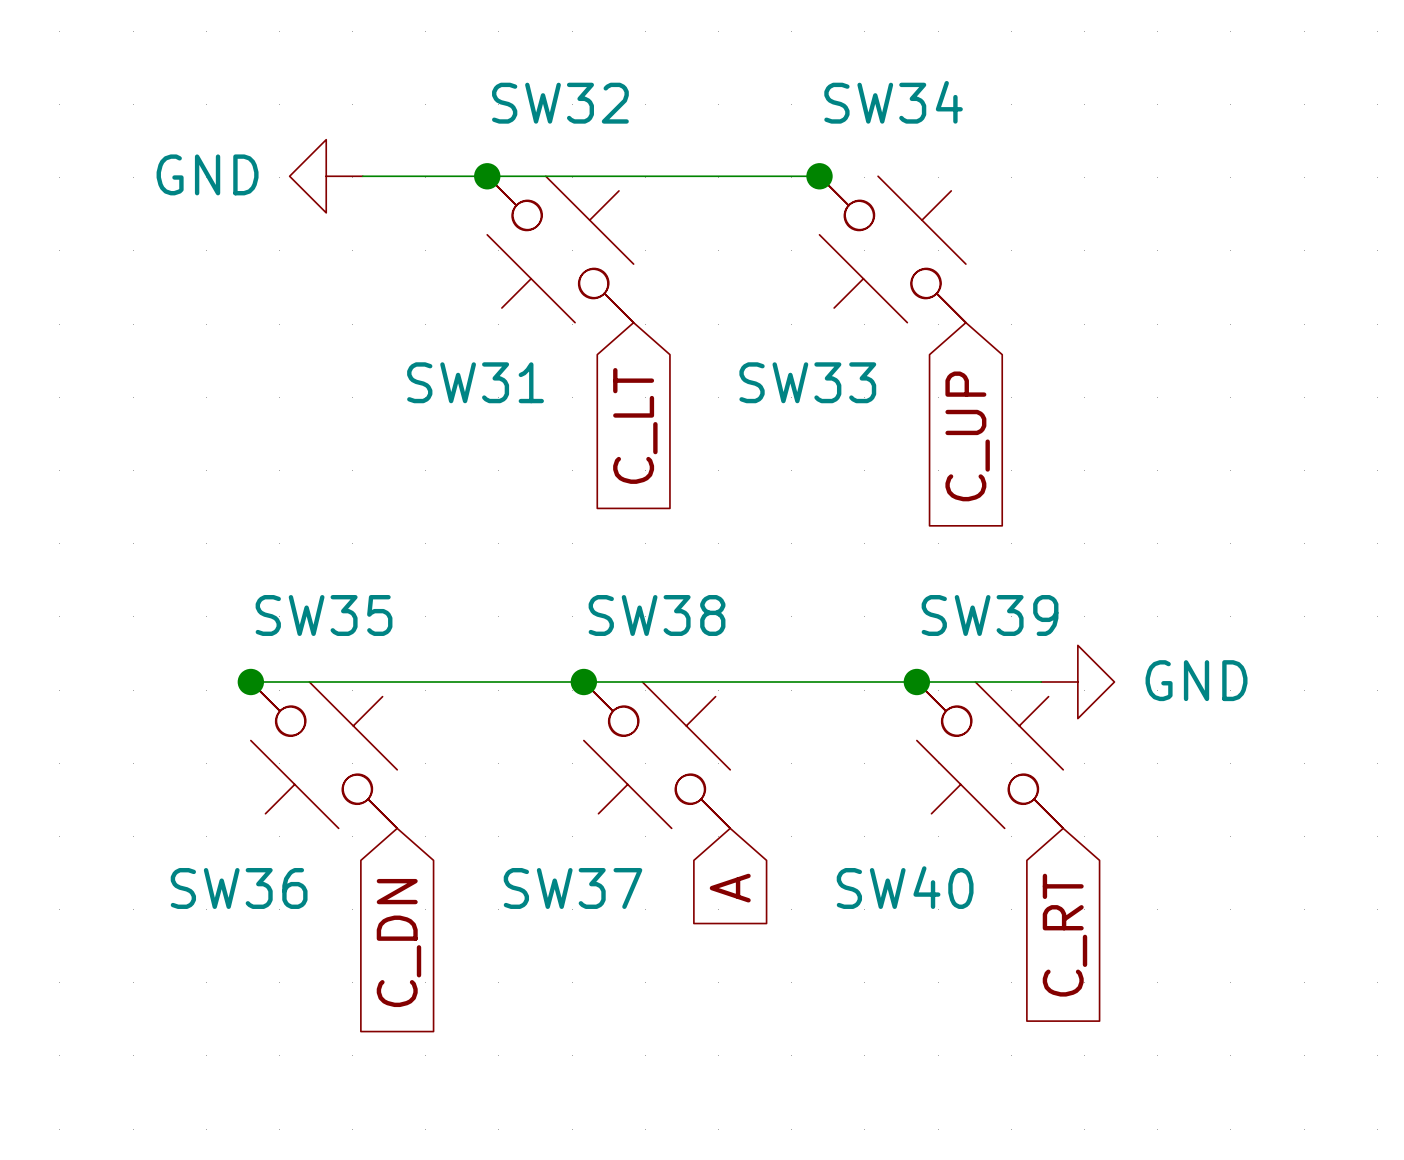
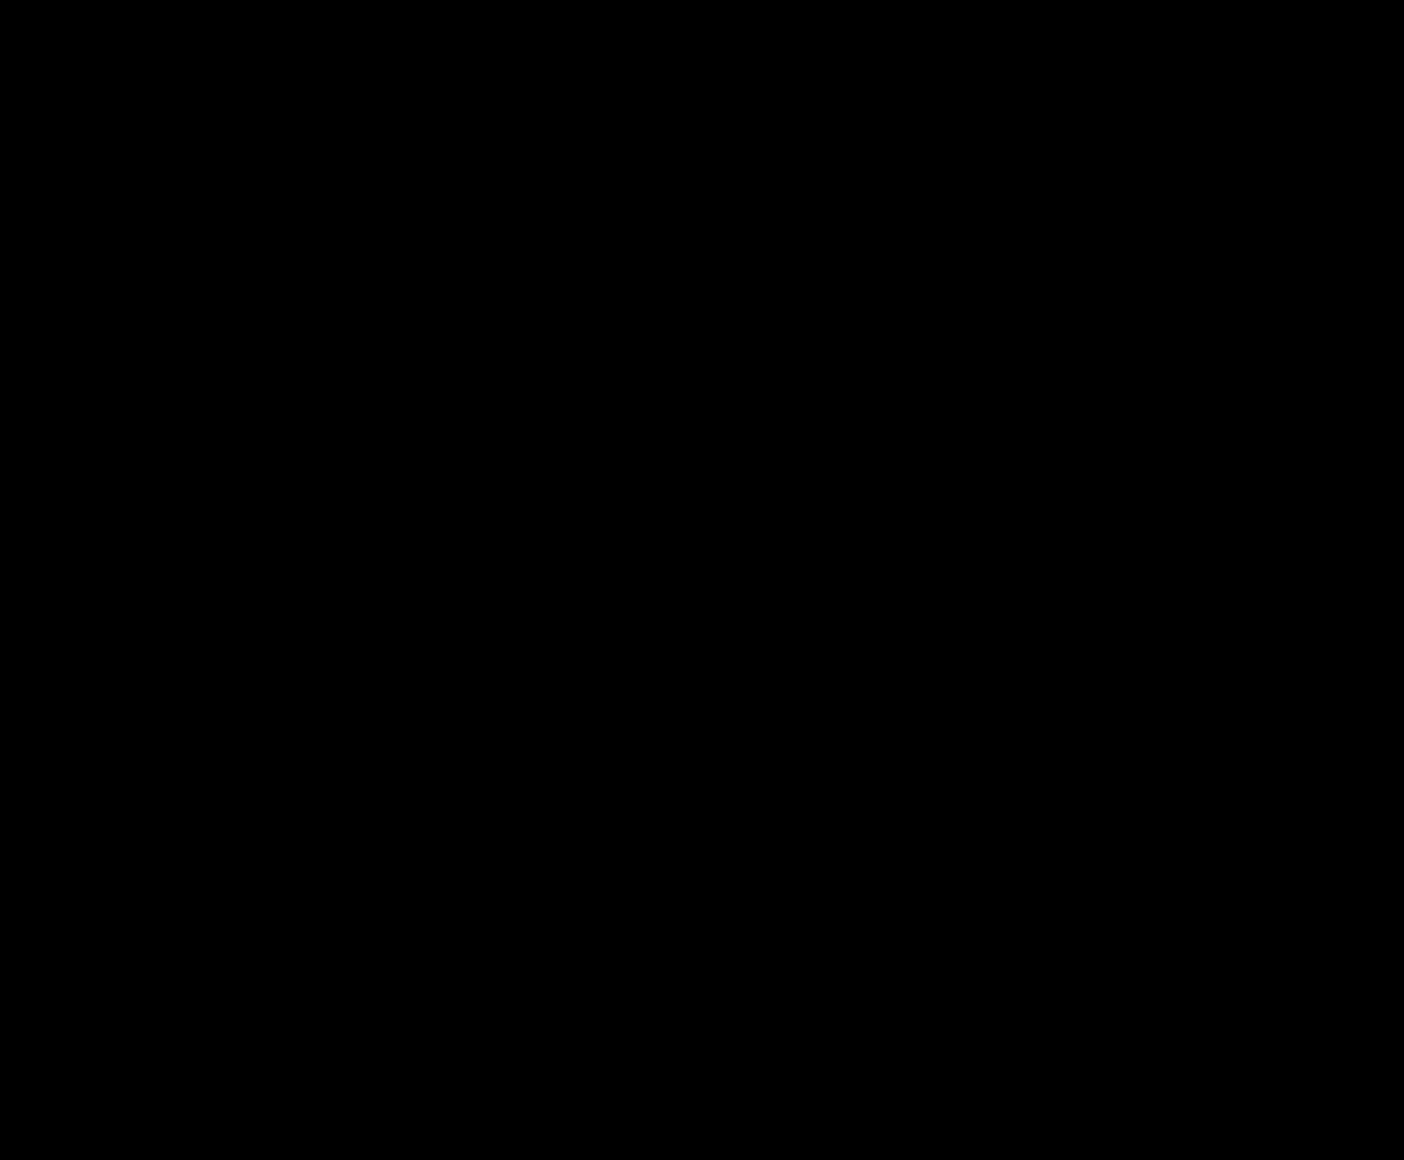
power symbol: GND (326, 176) -> none
wire: (362, 176) (819, 176) -> none
junction: (487, 176) -> none
junction: (819, 176) -> none
SW31: (560, 249) -> none
SW32: (560, 249) -> none
SW33: (892, 249) -> none
SW34: (892, 249) -> none
global label: C_LT (635, 425) -> none
global label: C_UP (967, 436) -> none
wire: (250, 682) (1041, 682) -> none
junction: (250, 682) -> none
junction: (583, 682) -> none
junction: (916, 682) -> none
power symbol: GND (1077, 682) -> none
SW35: (324, 755) -> none
SW36: (324, 755) -> none
SW37: (657, 755) -> none
SW38: (657, 755) -> none
SW39: (990, 755) -> none
SW40: (990, 755) -> none
global label: A (730, 888) -> none
global label: C_RT (1064, 935) -> none
global label: C_DN (398, 943) -> none

